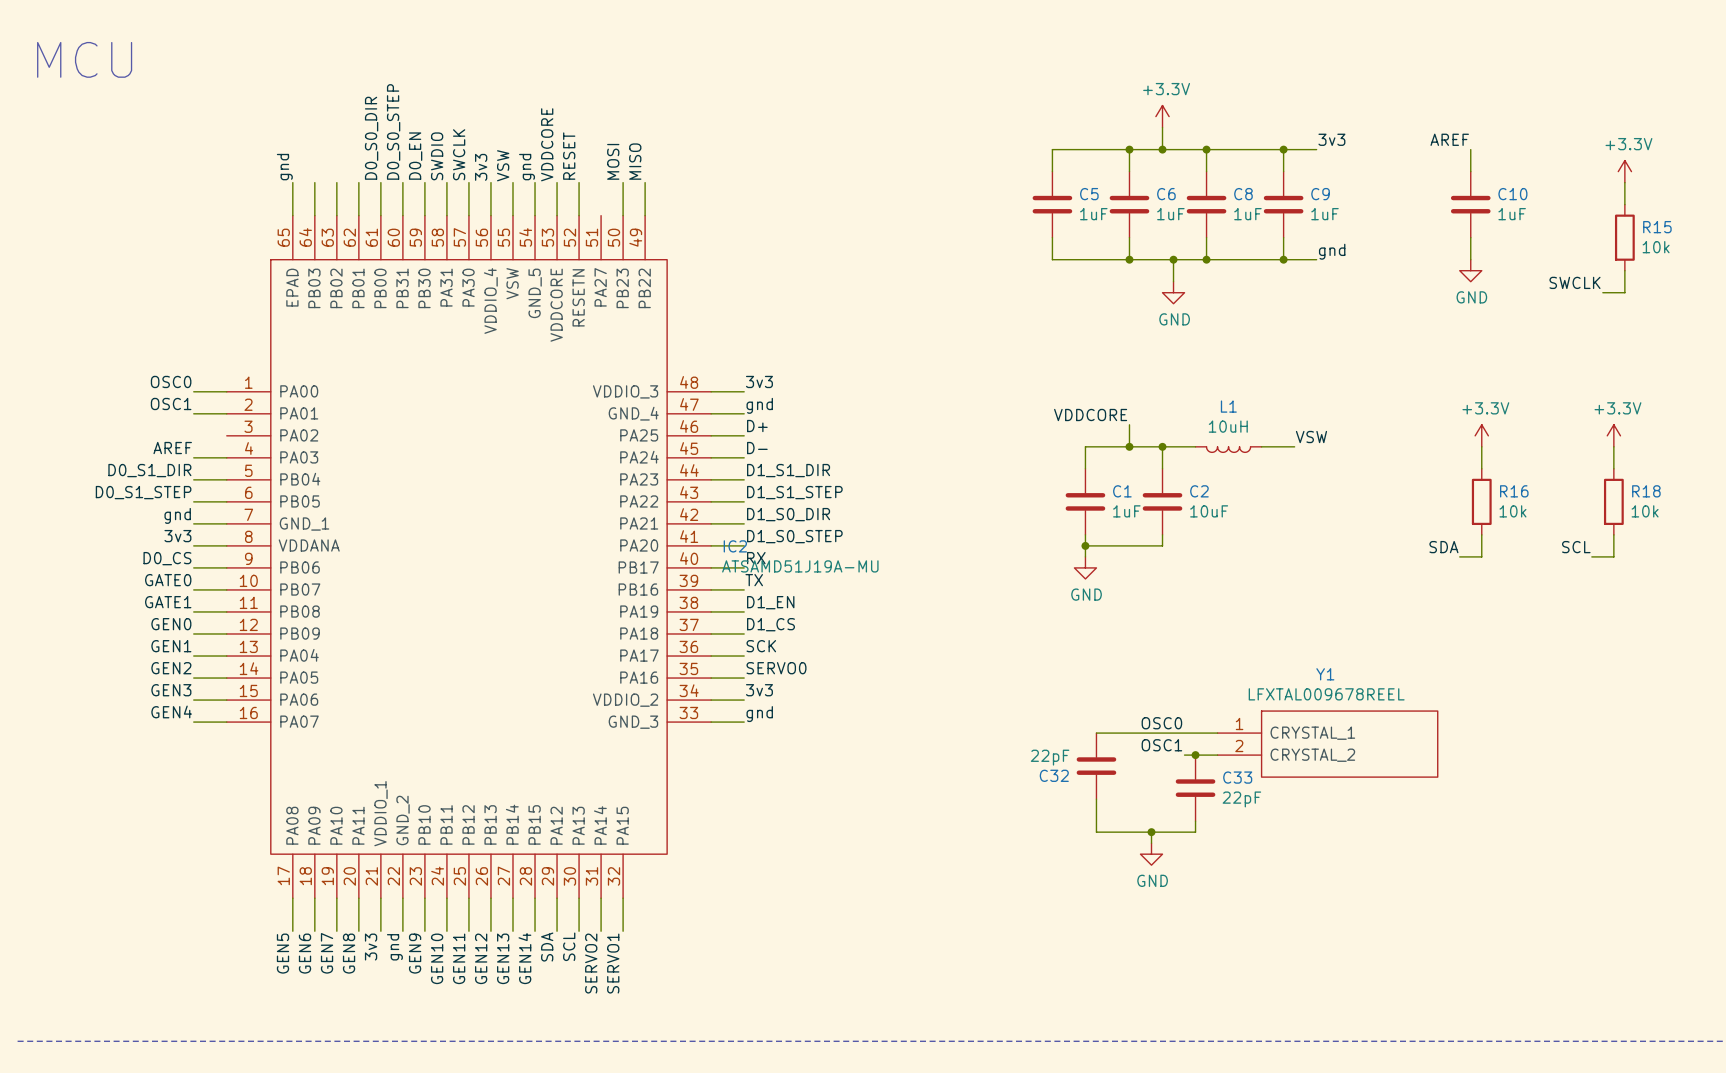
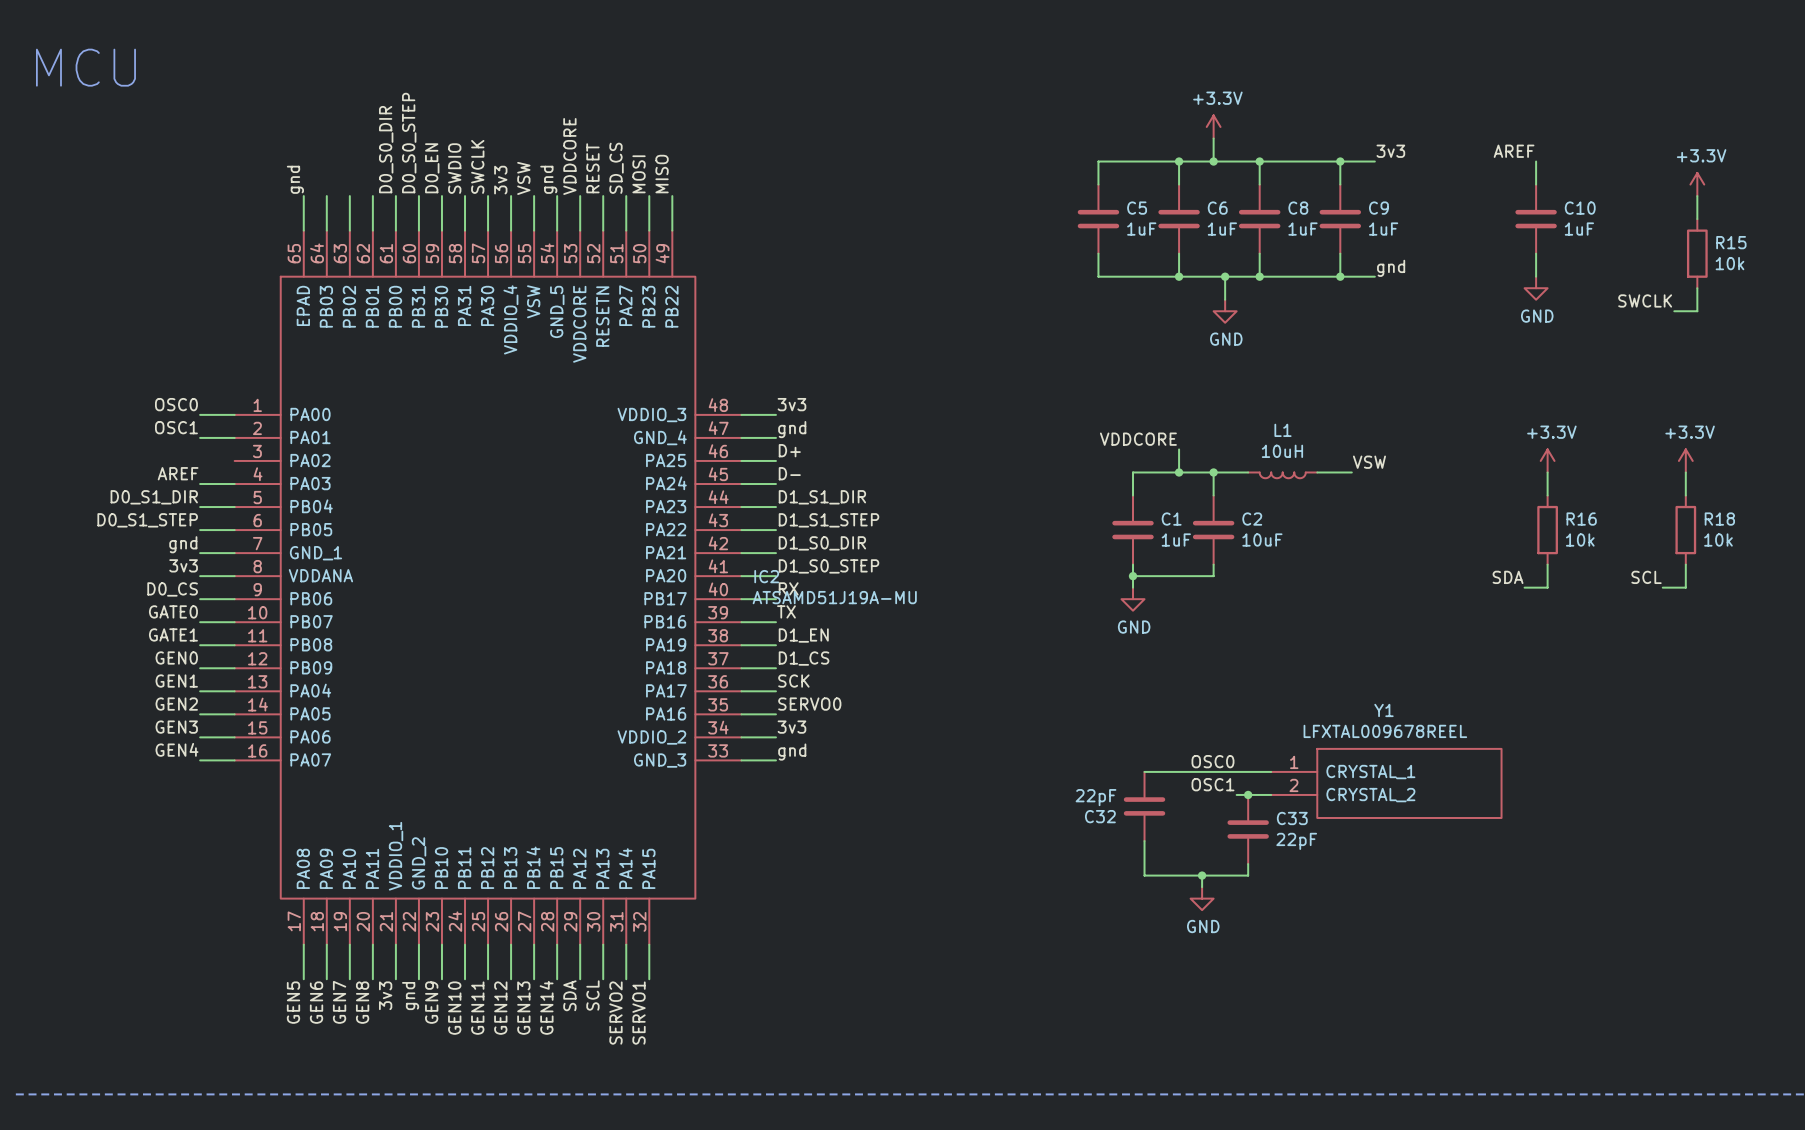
label: none -> SD_CS (616, 168)
wire: none -> (626, 196) (626, 230)

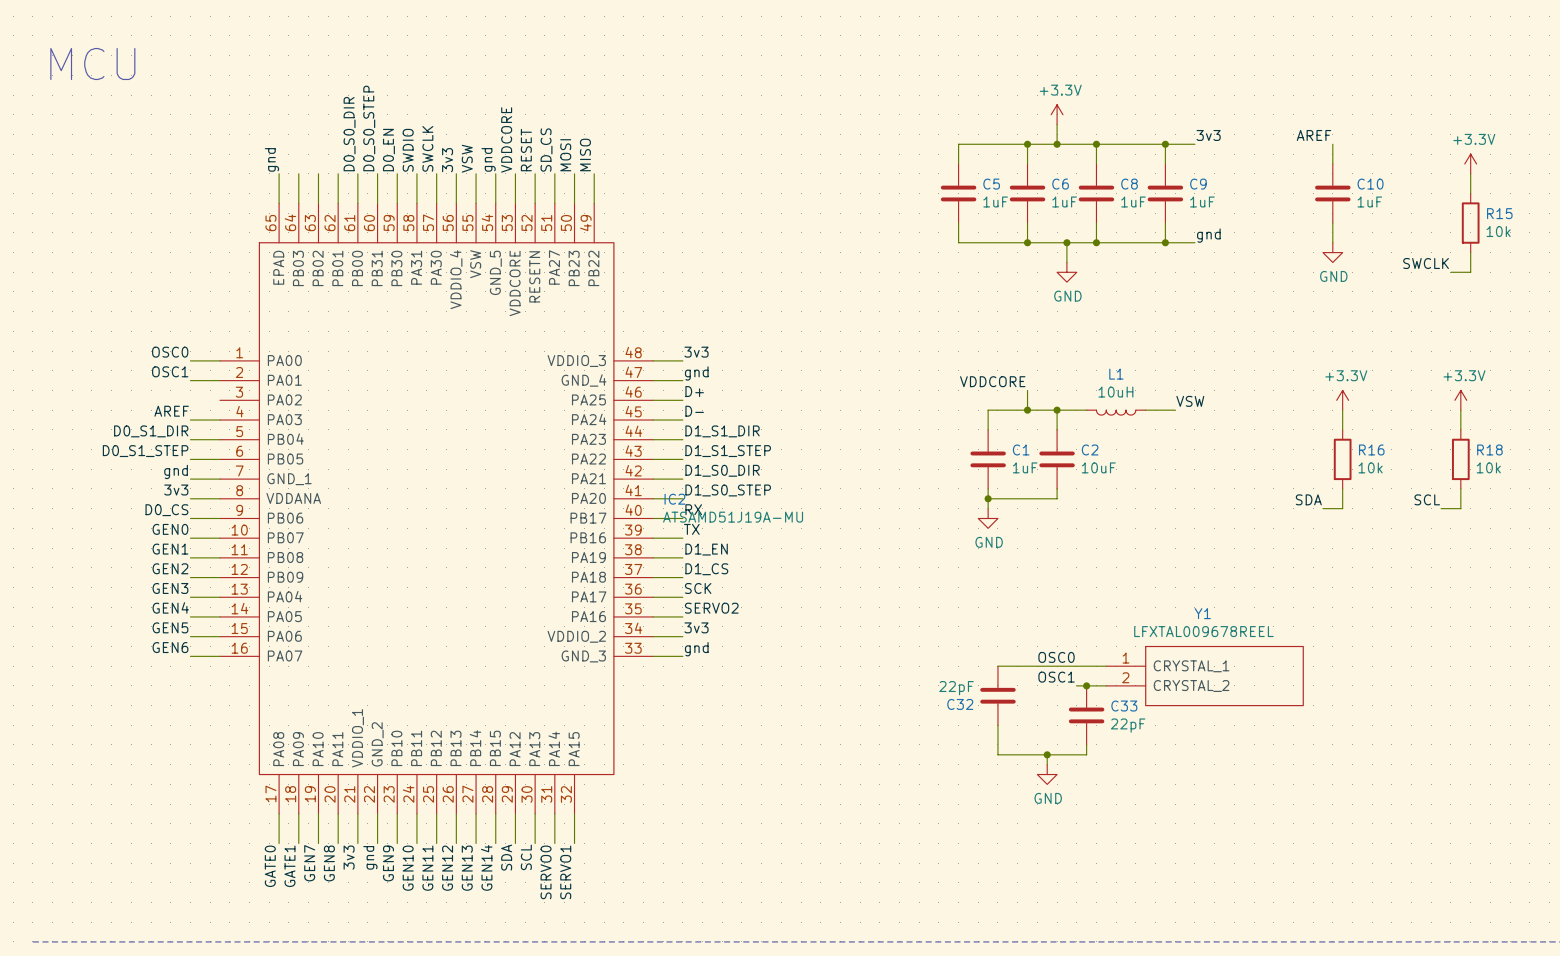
label: GATE0 (173, 611) -> GEN0 (170, 529)
label: GATE1 (173, 634) -> GEN1 (170, 549)
label: GEN0 (176, 657) -> GEN2 (170, 568)
label: GEN1 (176, 681) -> GEN3 (170, 588)
label: GEN2 (176, 704) -> GEN4 (170, 607)
label: SERVO0 (809, 704) -> SERVO2 (711, 608)
label: GEN3 (176, 727) -> GEN5 (170, 627)
label: GEN4 (177, 749) -> GEN6 (170, 647)
label: GEN5 (293, 1002) -> GATE0 (270, 866)
label: GEN6 (316, 1002) -> GATE1 (289, 866)
label: SERVO2 (615, 1013) -> SERVO0 (546, 872)

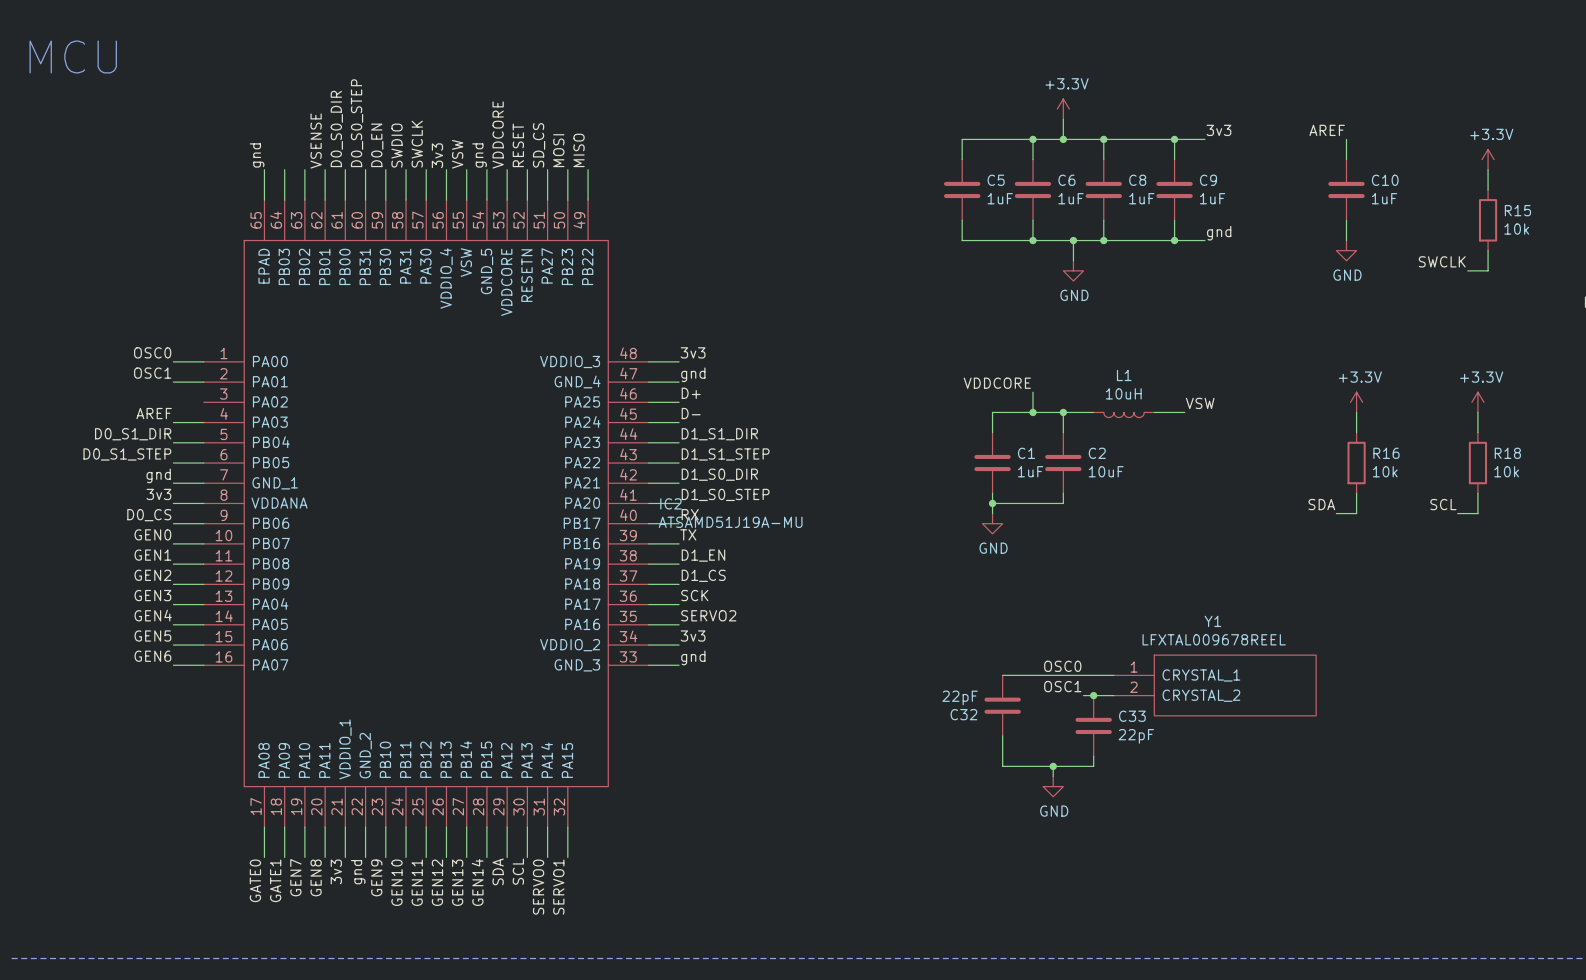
label: none -> VSENSE (316, 141)

